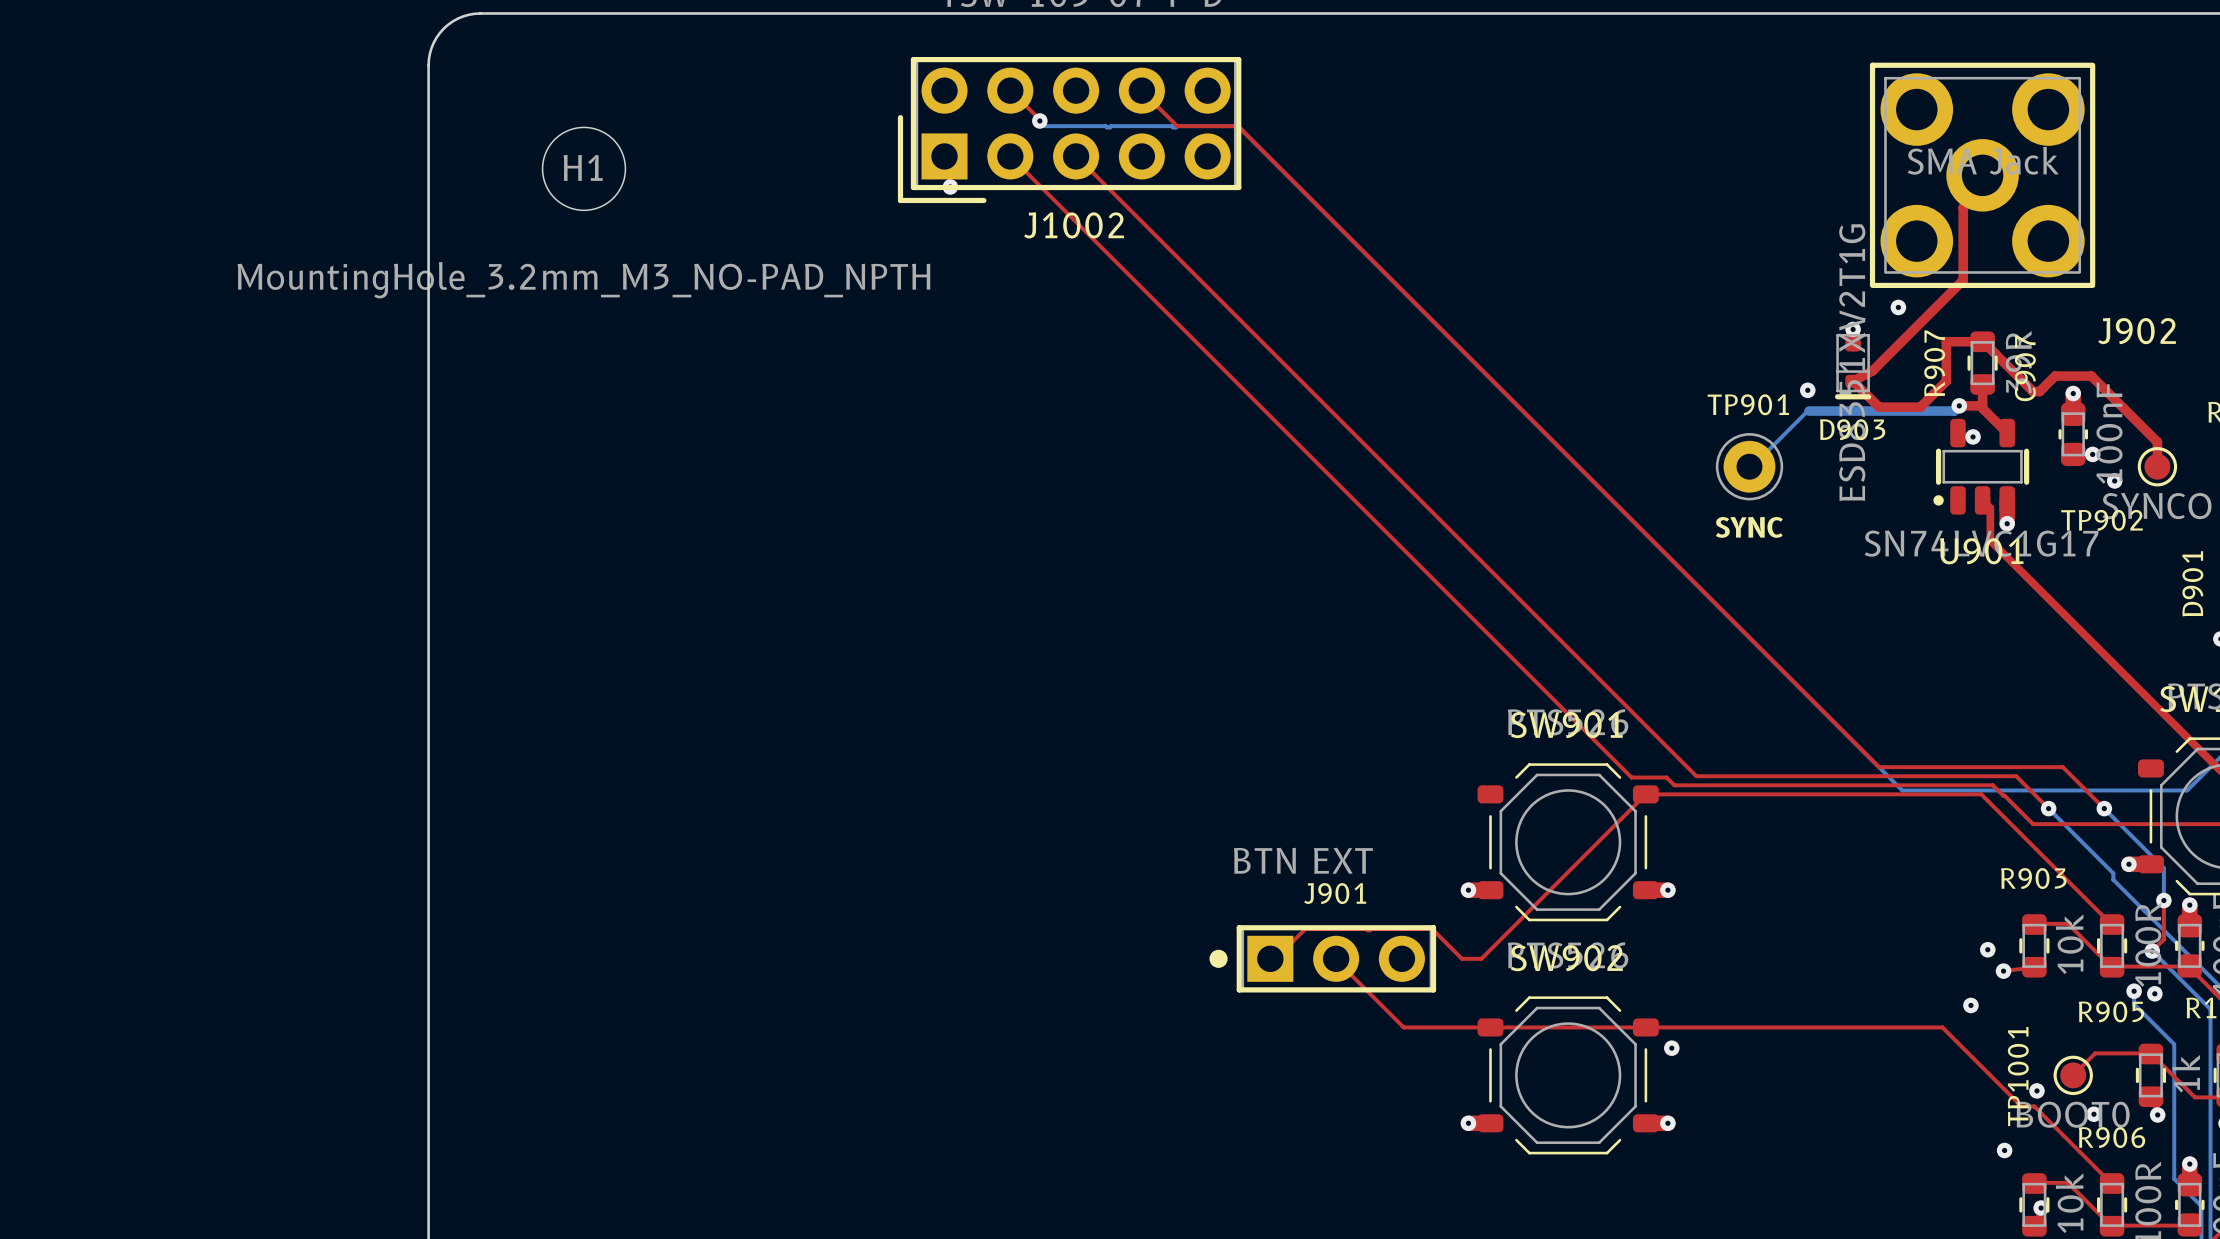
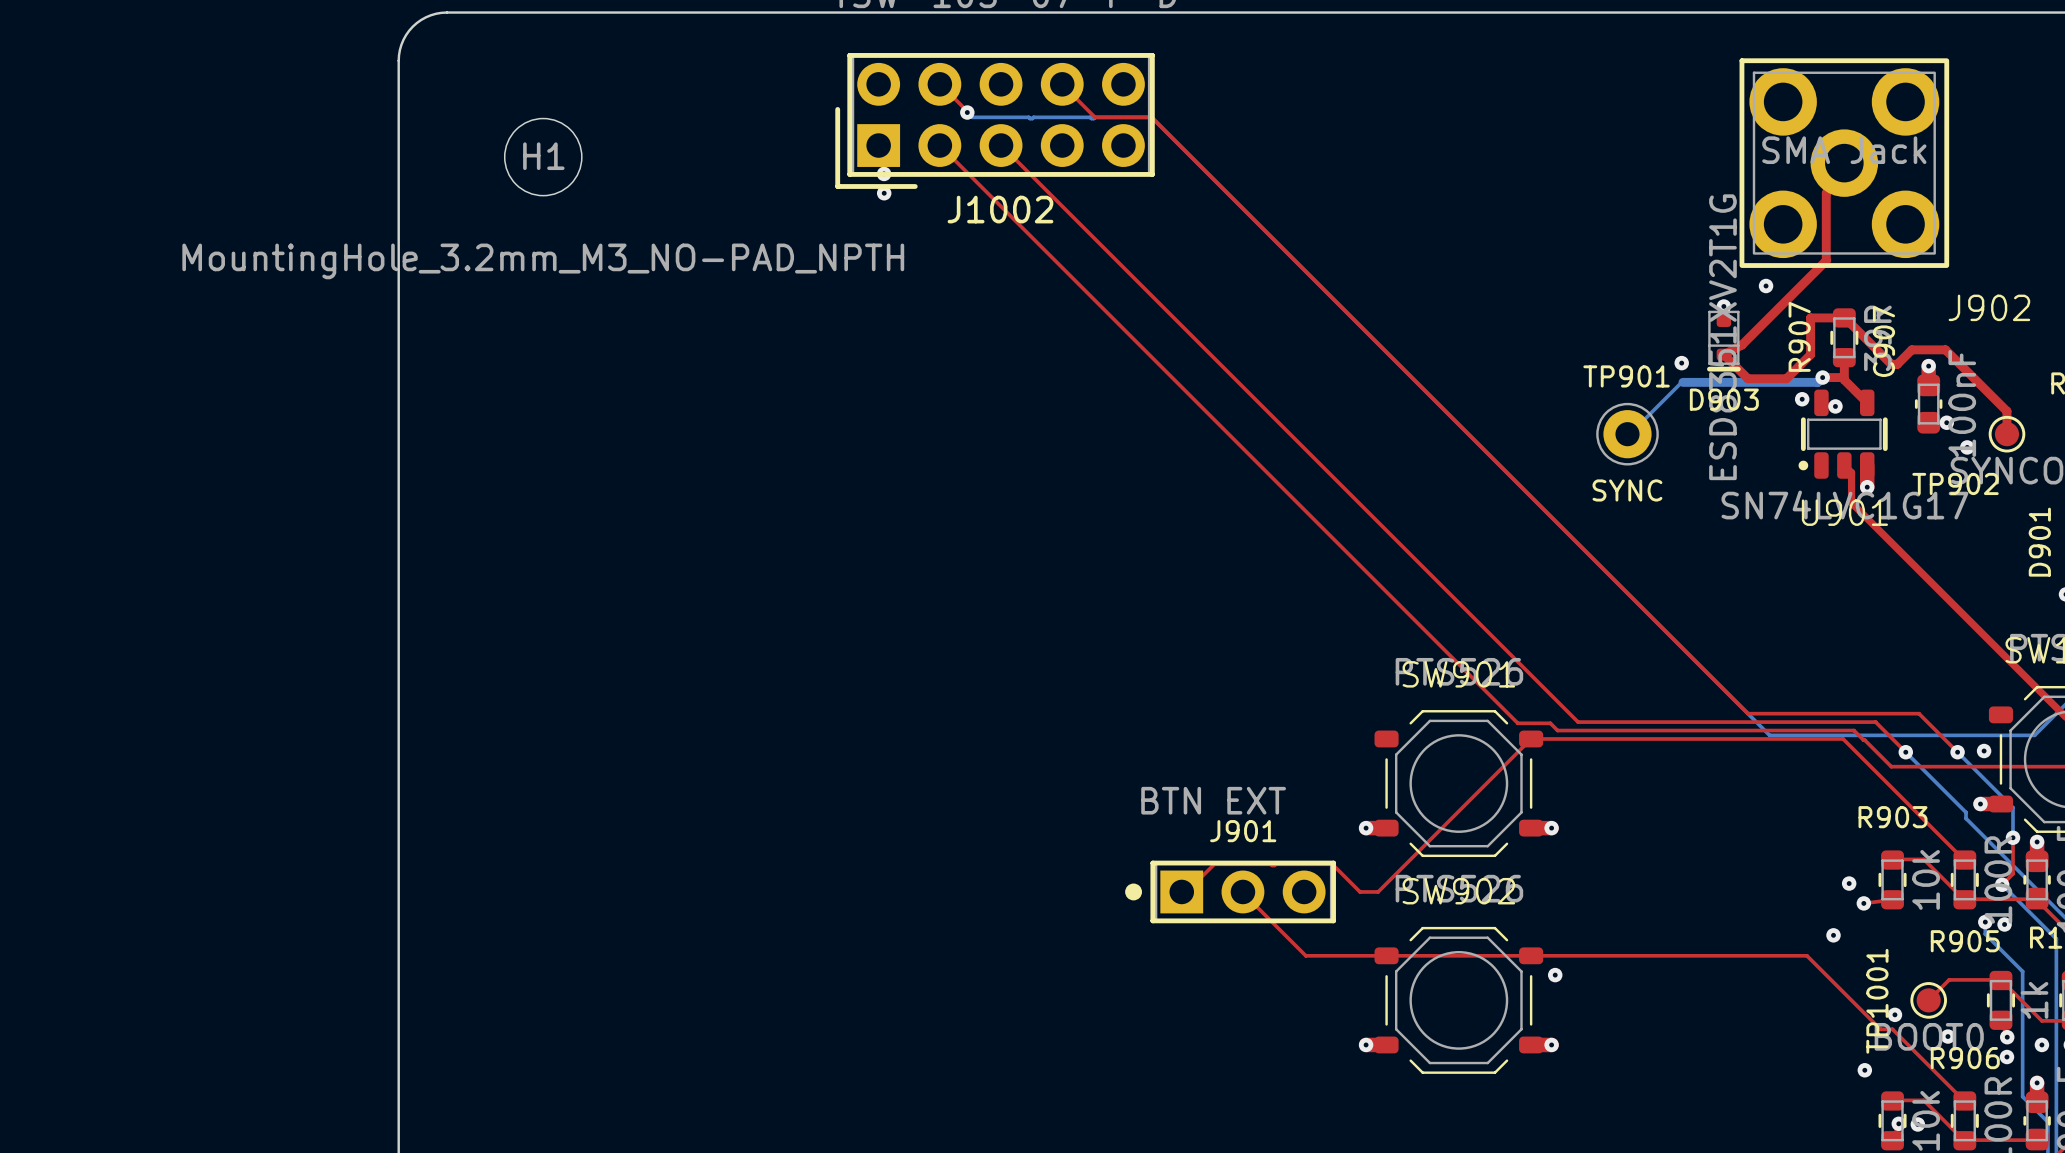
via: none -> (884, 193)
via: none -> (1802, 399)
via: none -> (1984, 751)
via: none -> (2041, 1044)
via: none -> (2006, 1057)
via: none -> (1917, 1124)

